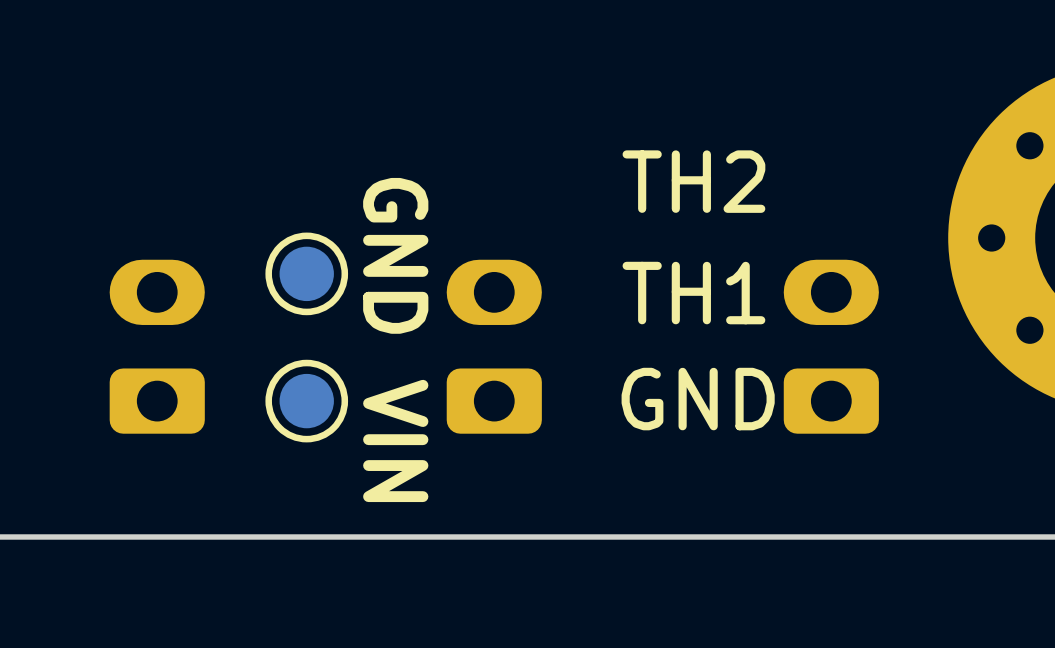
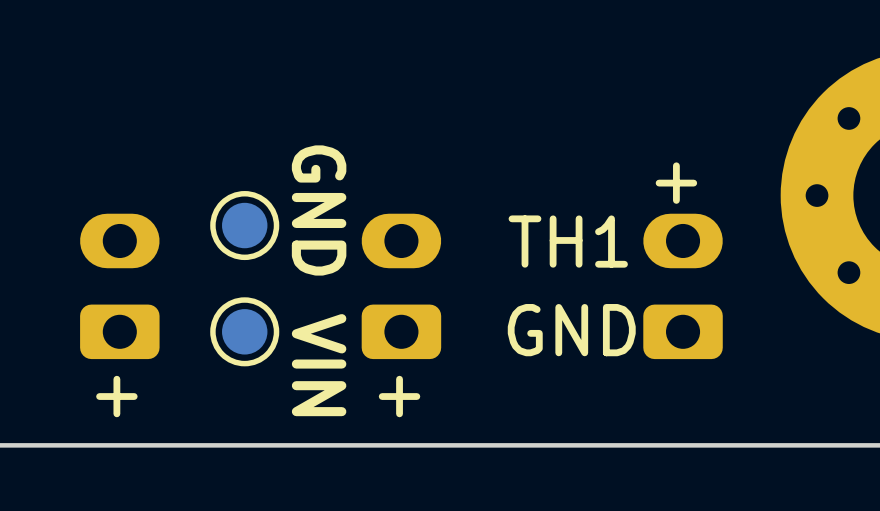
text: TH2 (693, 181) -> none
text: none -> + (676, 183)
text: none -> + (116, 396)
text: none -> + (399, 396)

